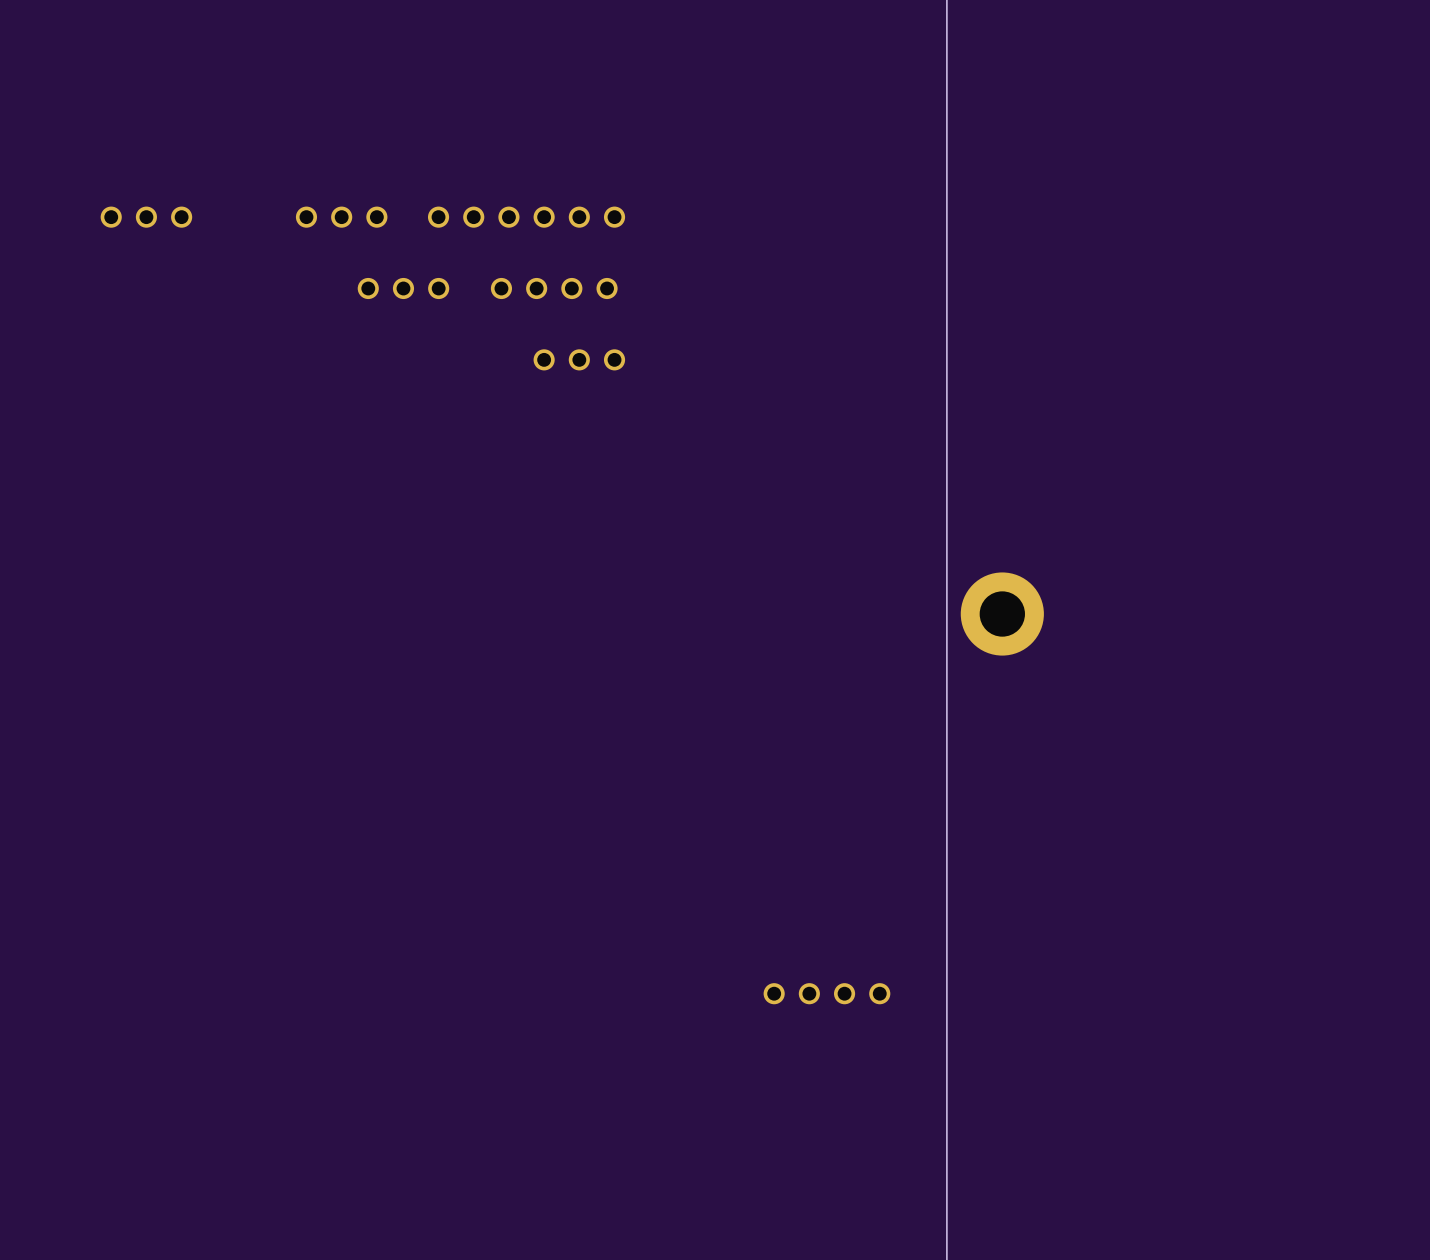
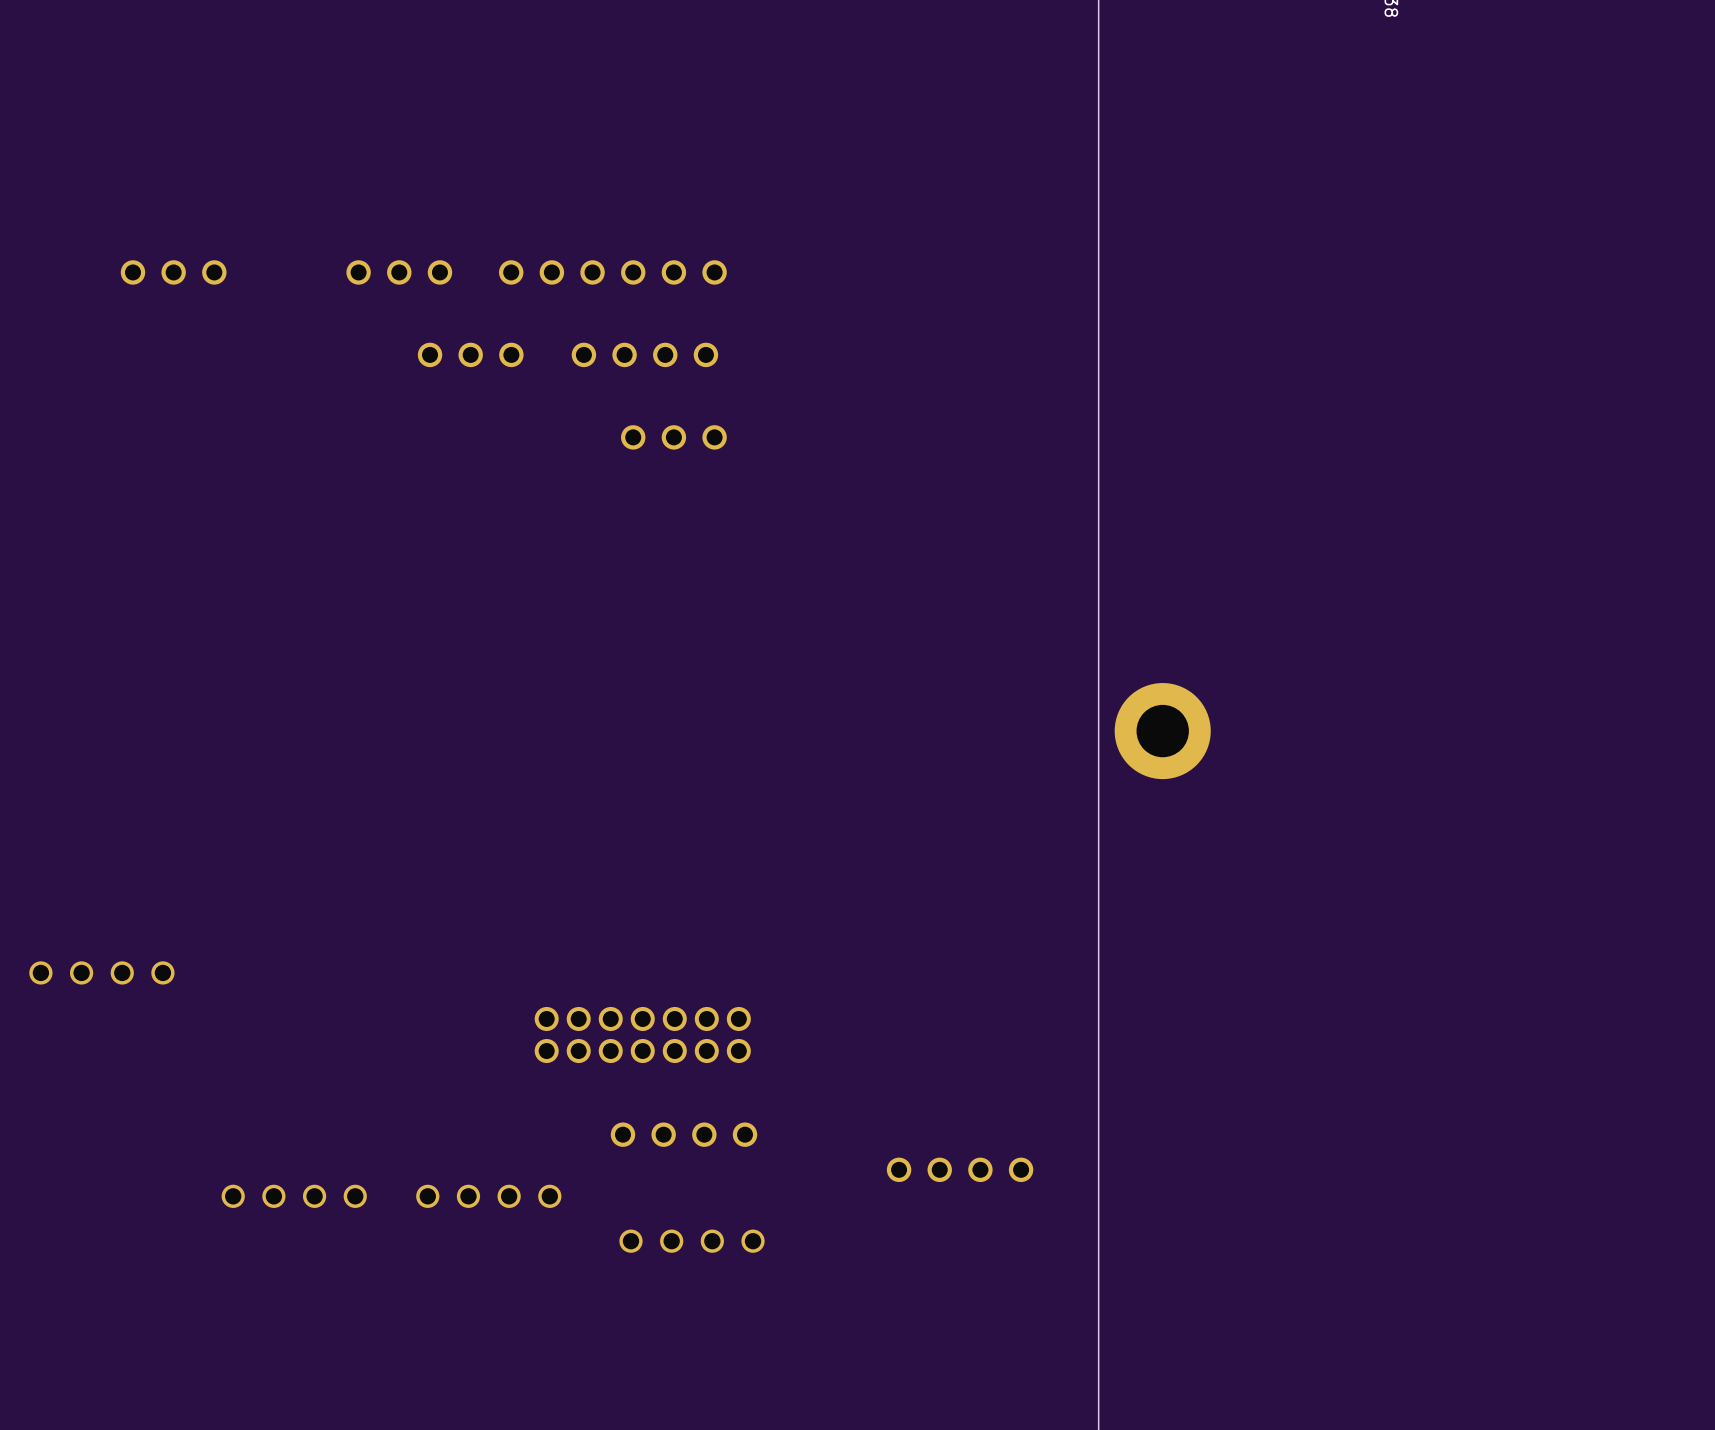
part: none -> (101, 972)
part: none -> (642, 1035)
part: none -> (684, 1134)
part: none -> (294, 1196)
part: none -> (488, 1196)
part: none -> (692, 1241)

